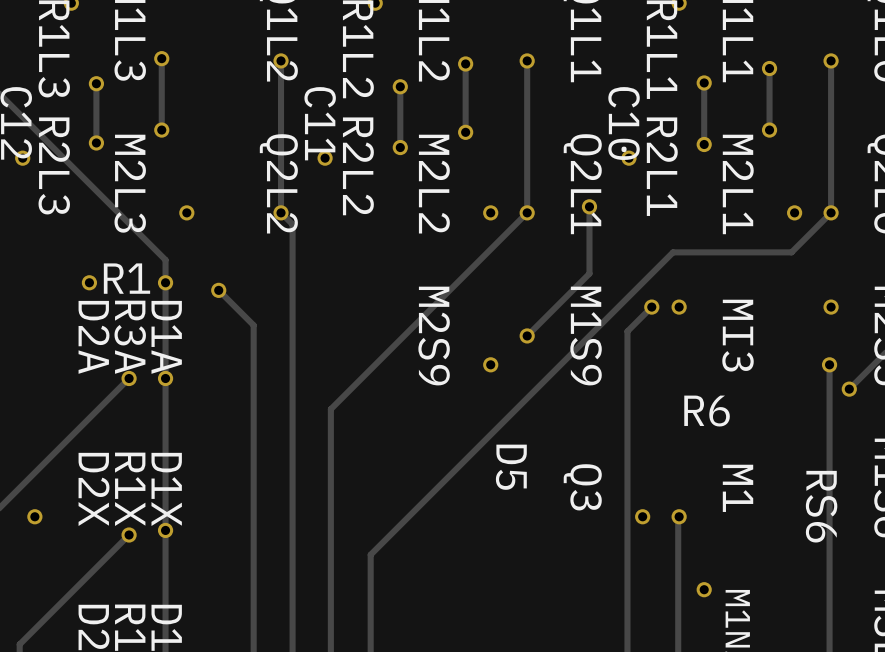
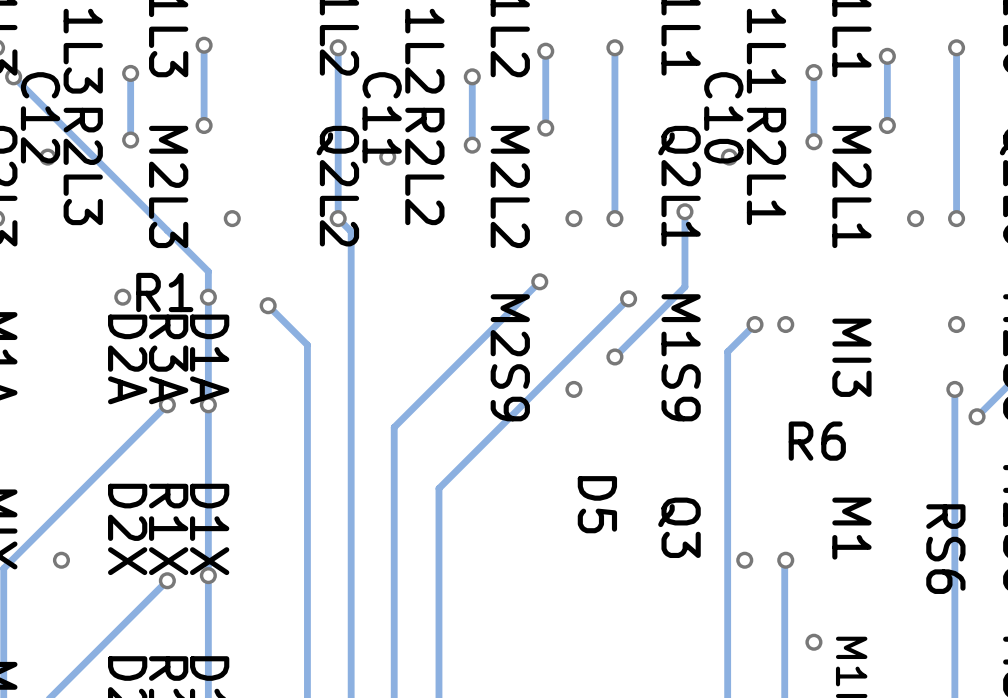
track: (527, 212) (330, 409) -> (539, 281) (394, 427) (394, 439)
track: (831, 212) (791, 252) (673, 252) (370, 554) -> (628, 298) (438, 488) (438, 602)
via: none -> (539, 281)
via: none -> (628, 298)

